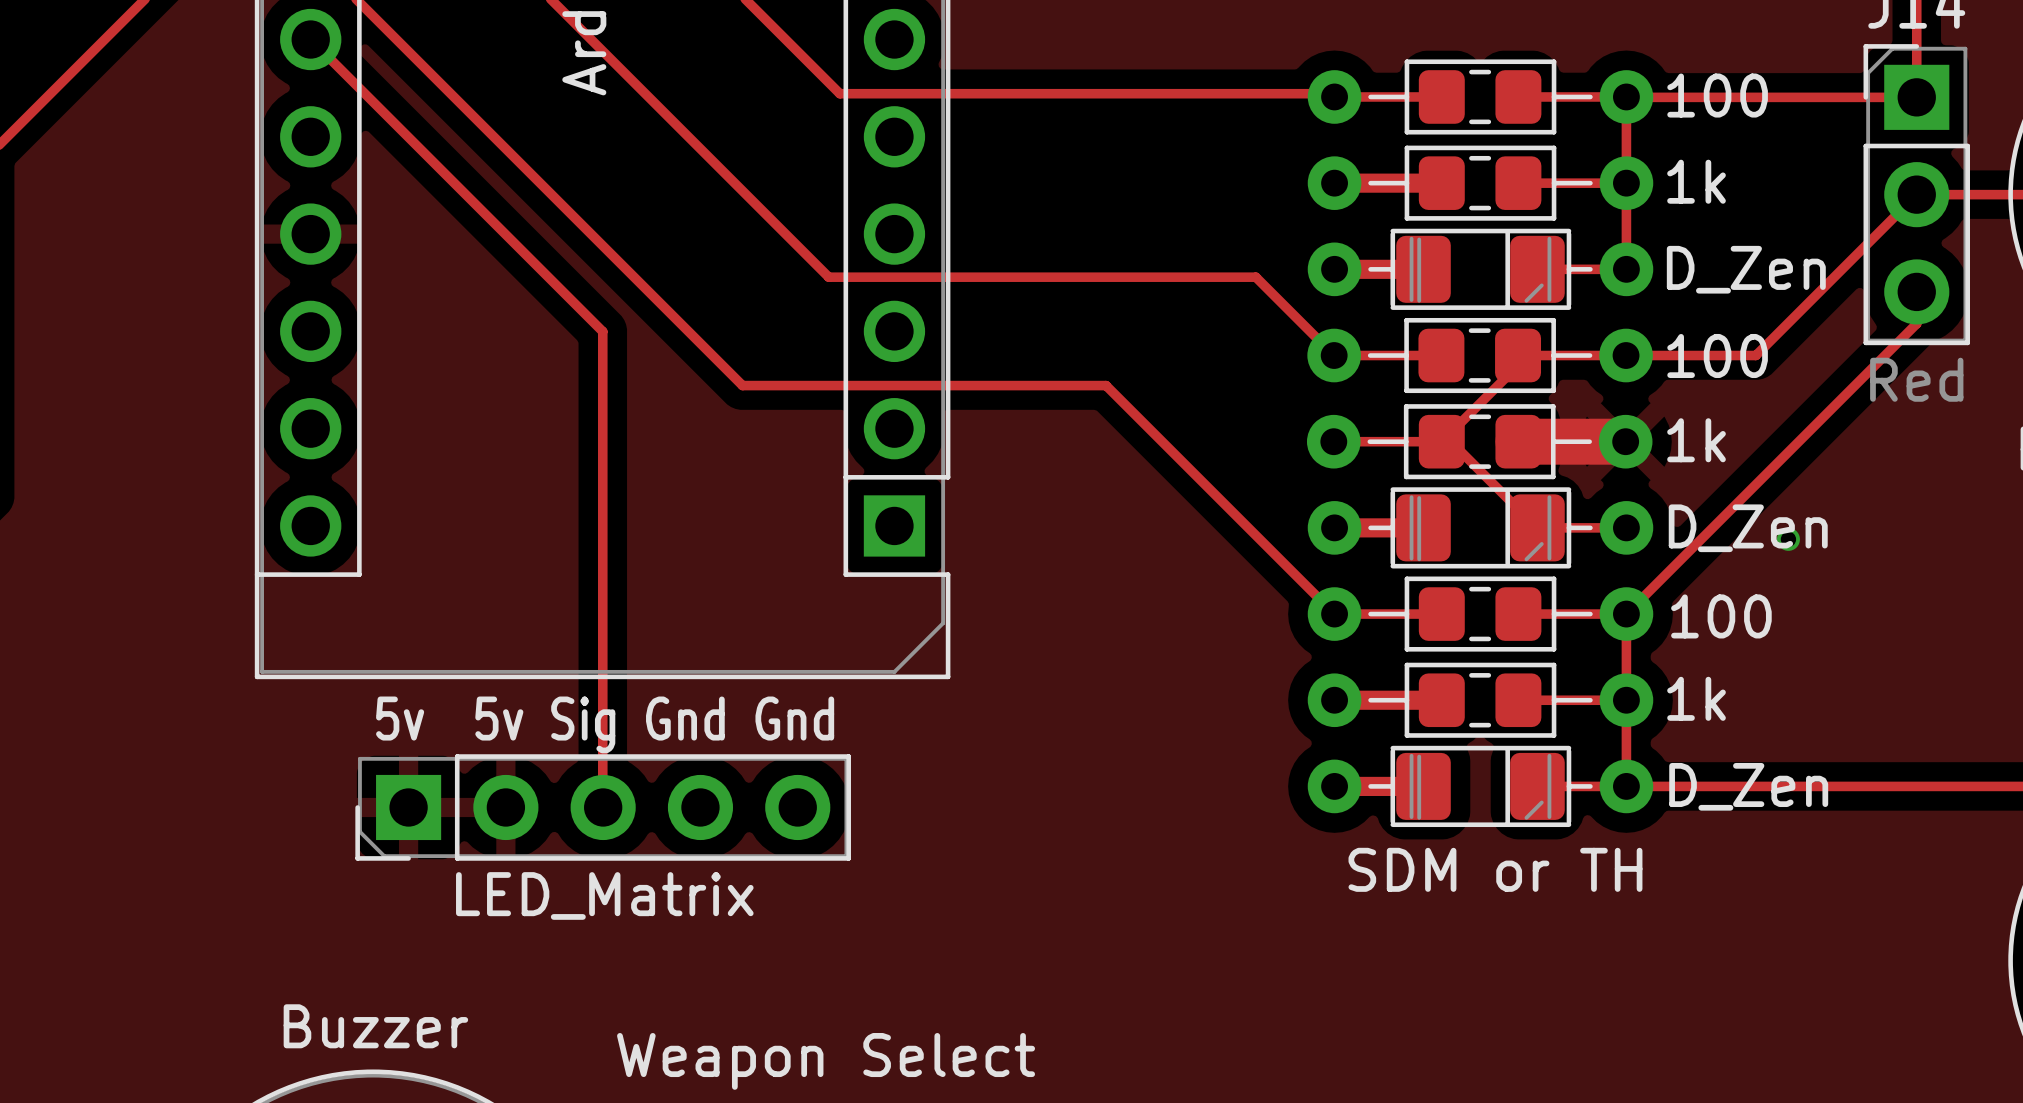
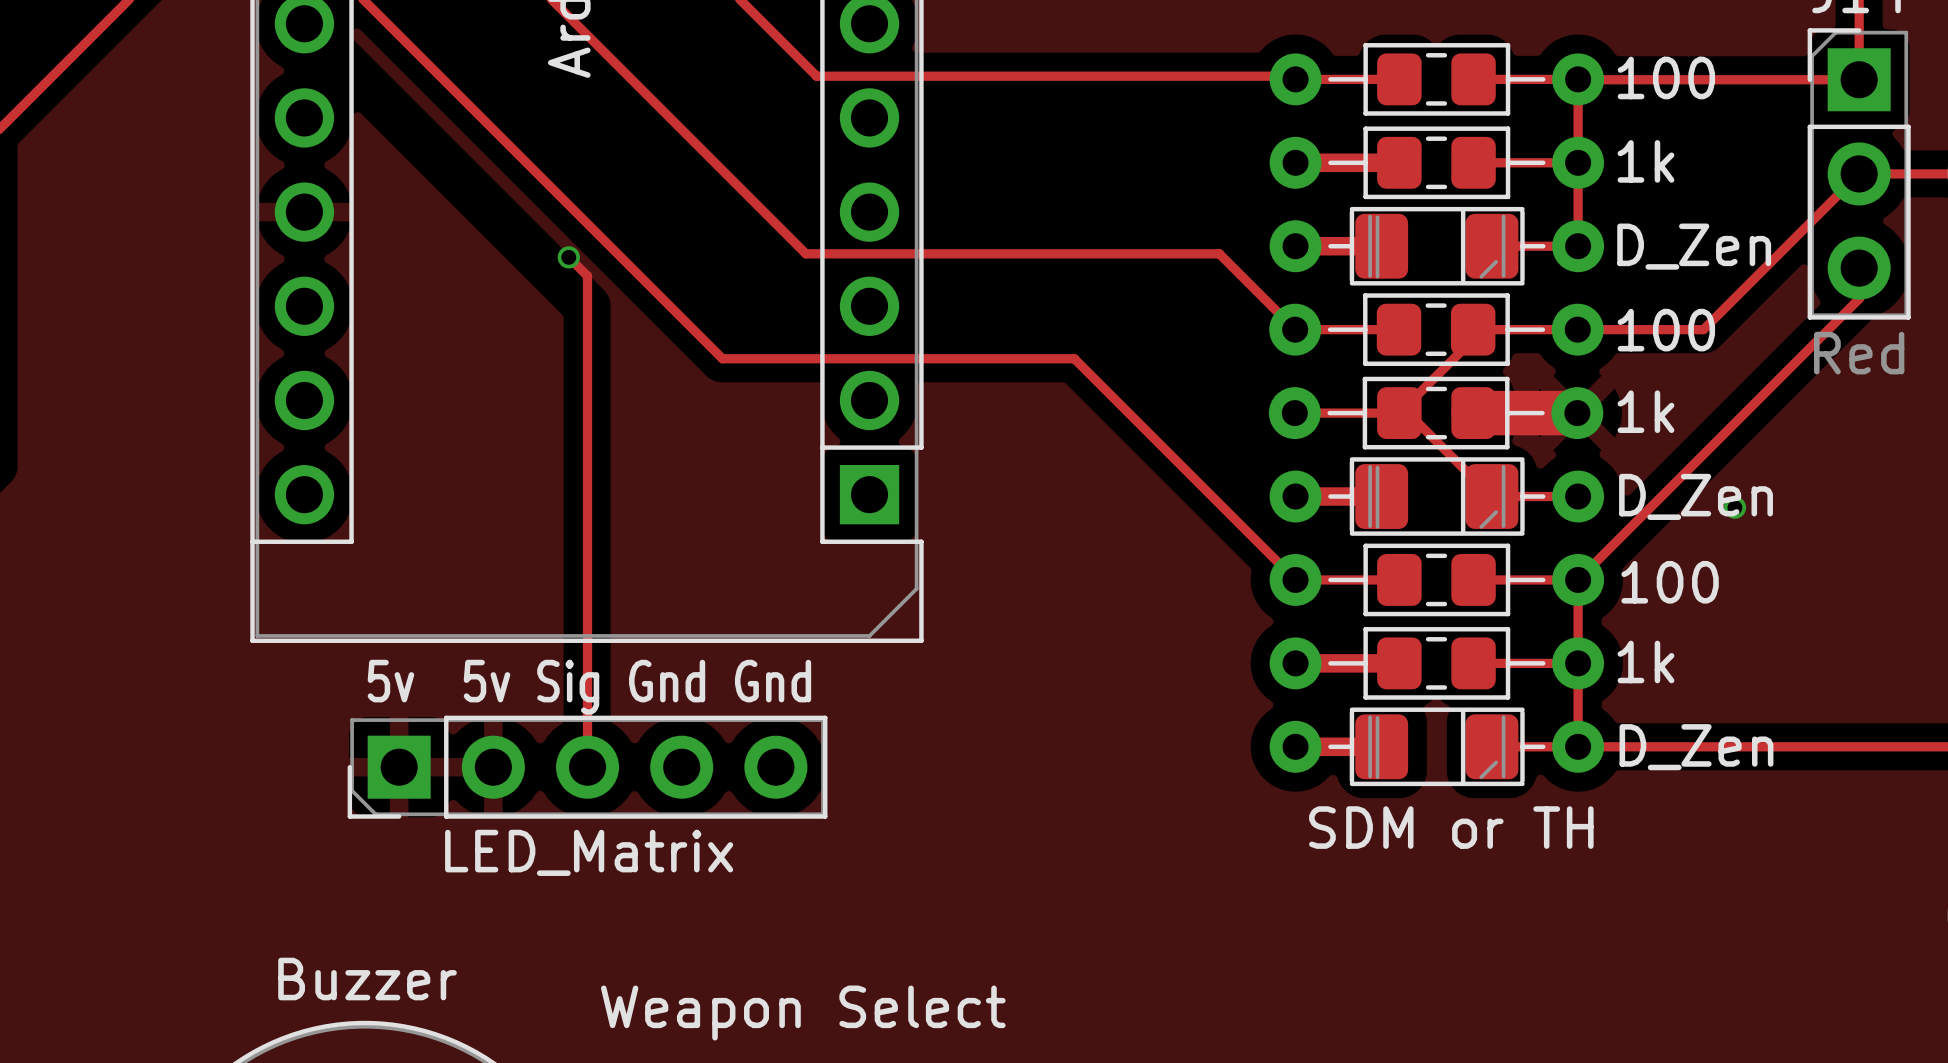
track: (310, 39) (602, 331) (602, 807) -> (568, 257) (587, 276) (587, 767)
via: none -> (568, 257)

